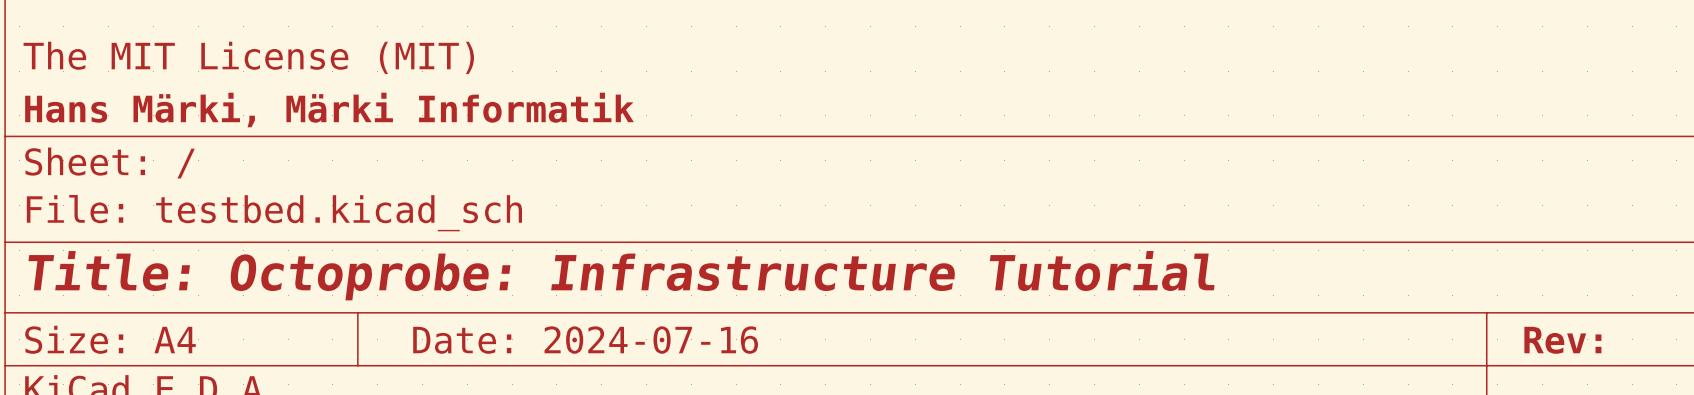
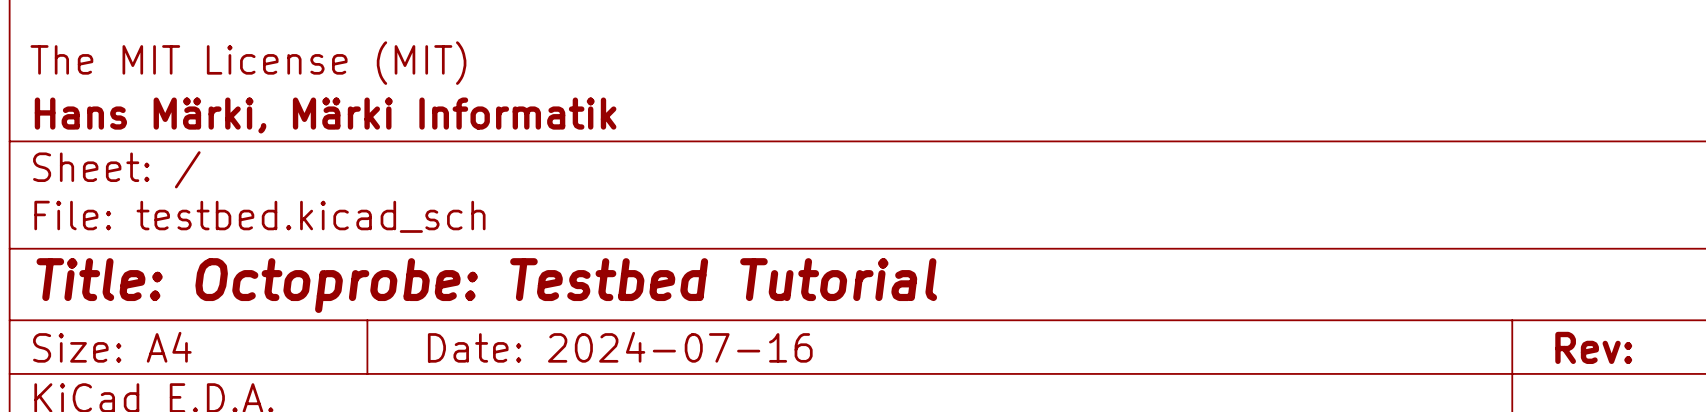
title block: Title: Octoprobe: Infrastructure Tutorial (621, 275) -> Title: Octoprobe: Testbed Tutorial (486, 285)

